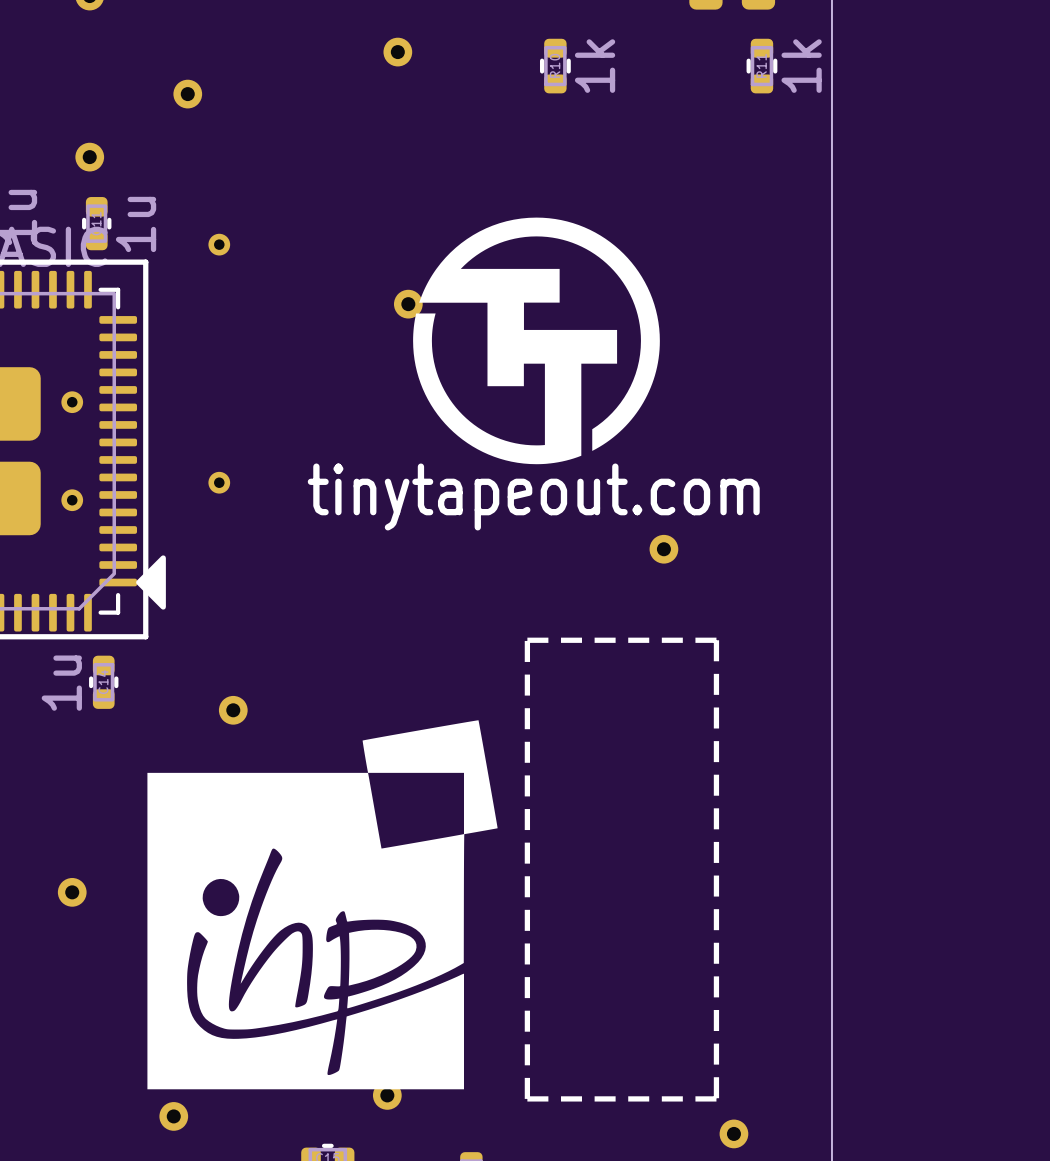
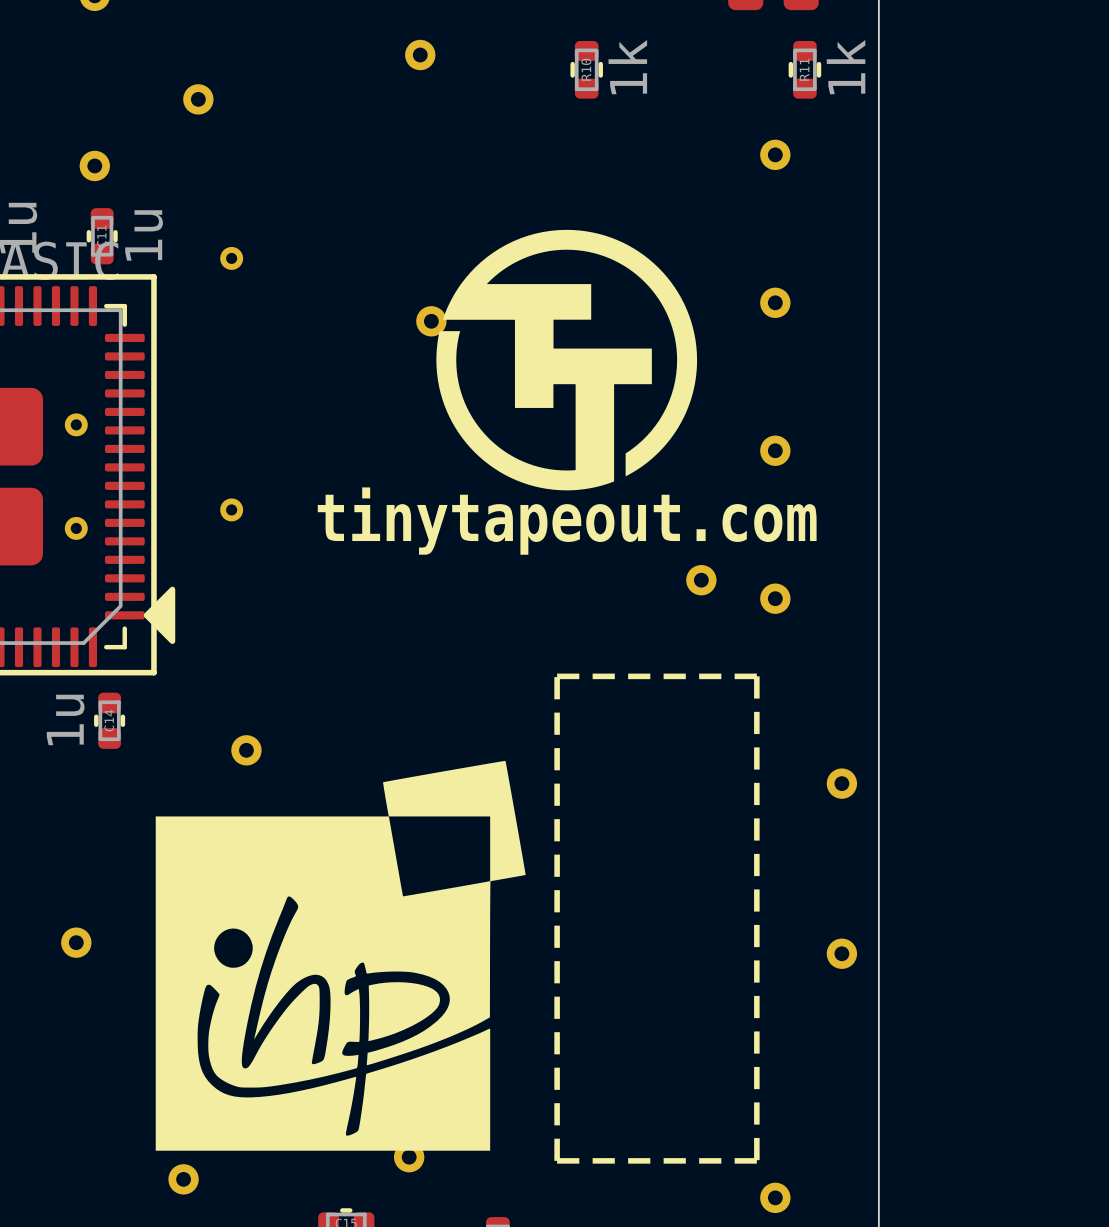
part: none -> (775, 154)
part: none -> (775, 302)
part: none -> (775, 450)
part: none -> (775, 598)
part: none -> (841, 783)
part: none -> (841, 953)

